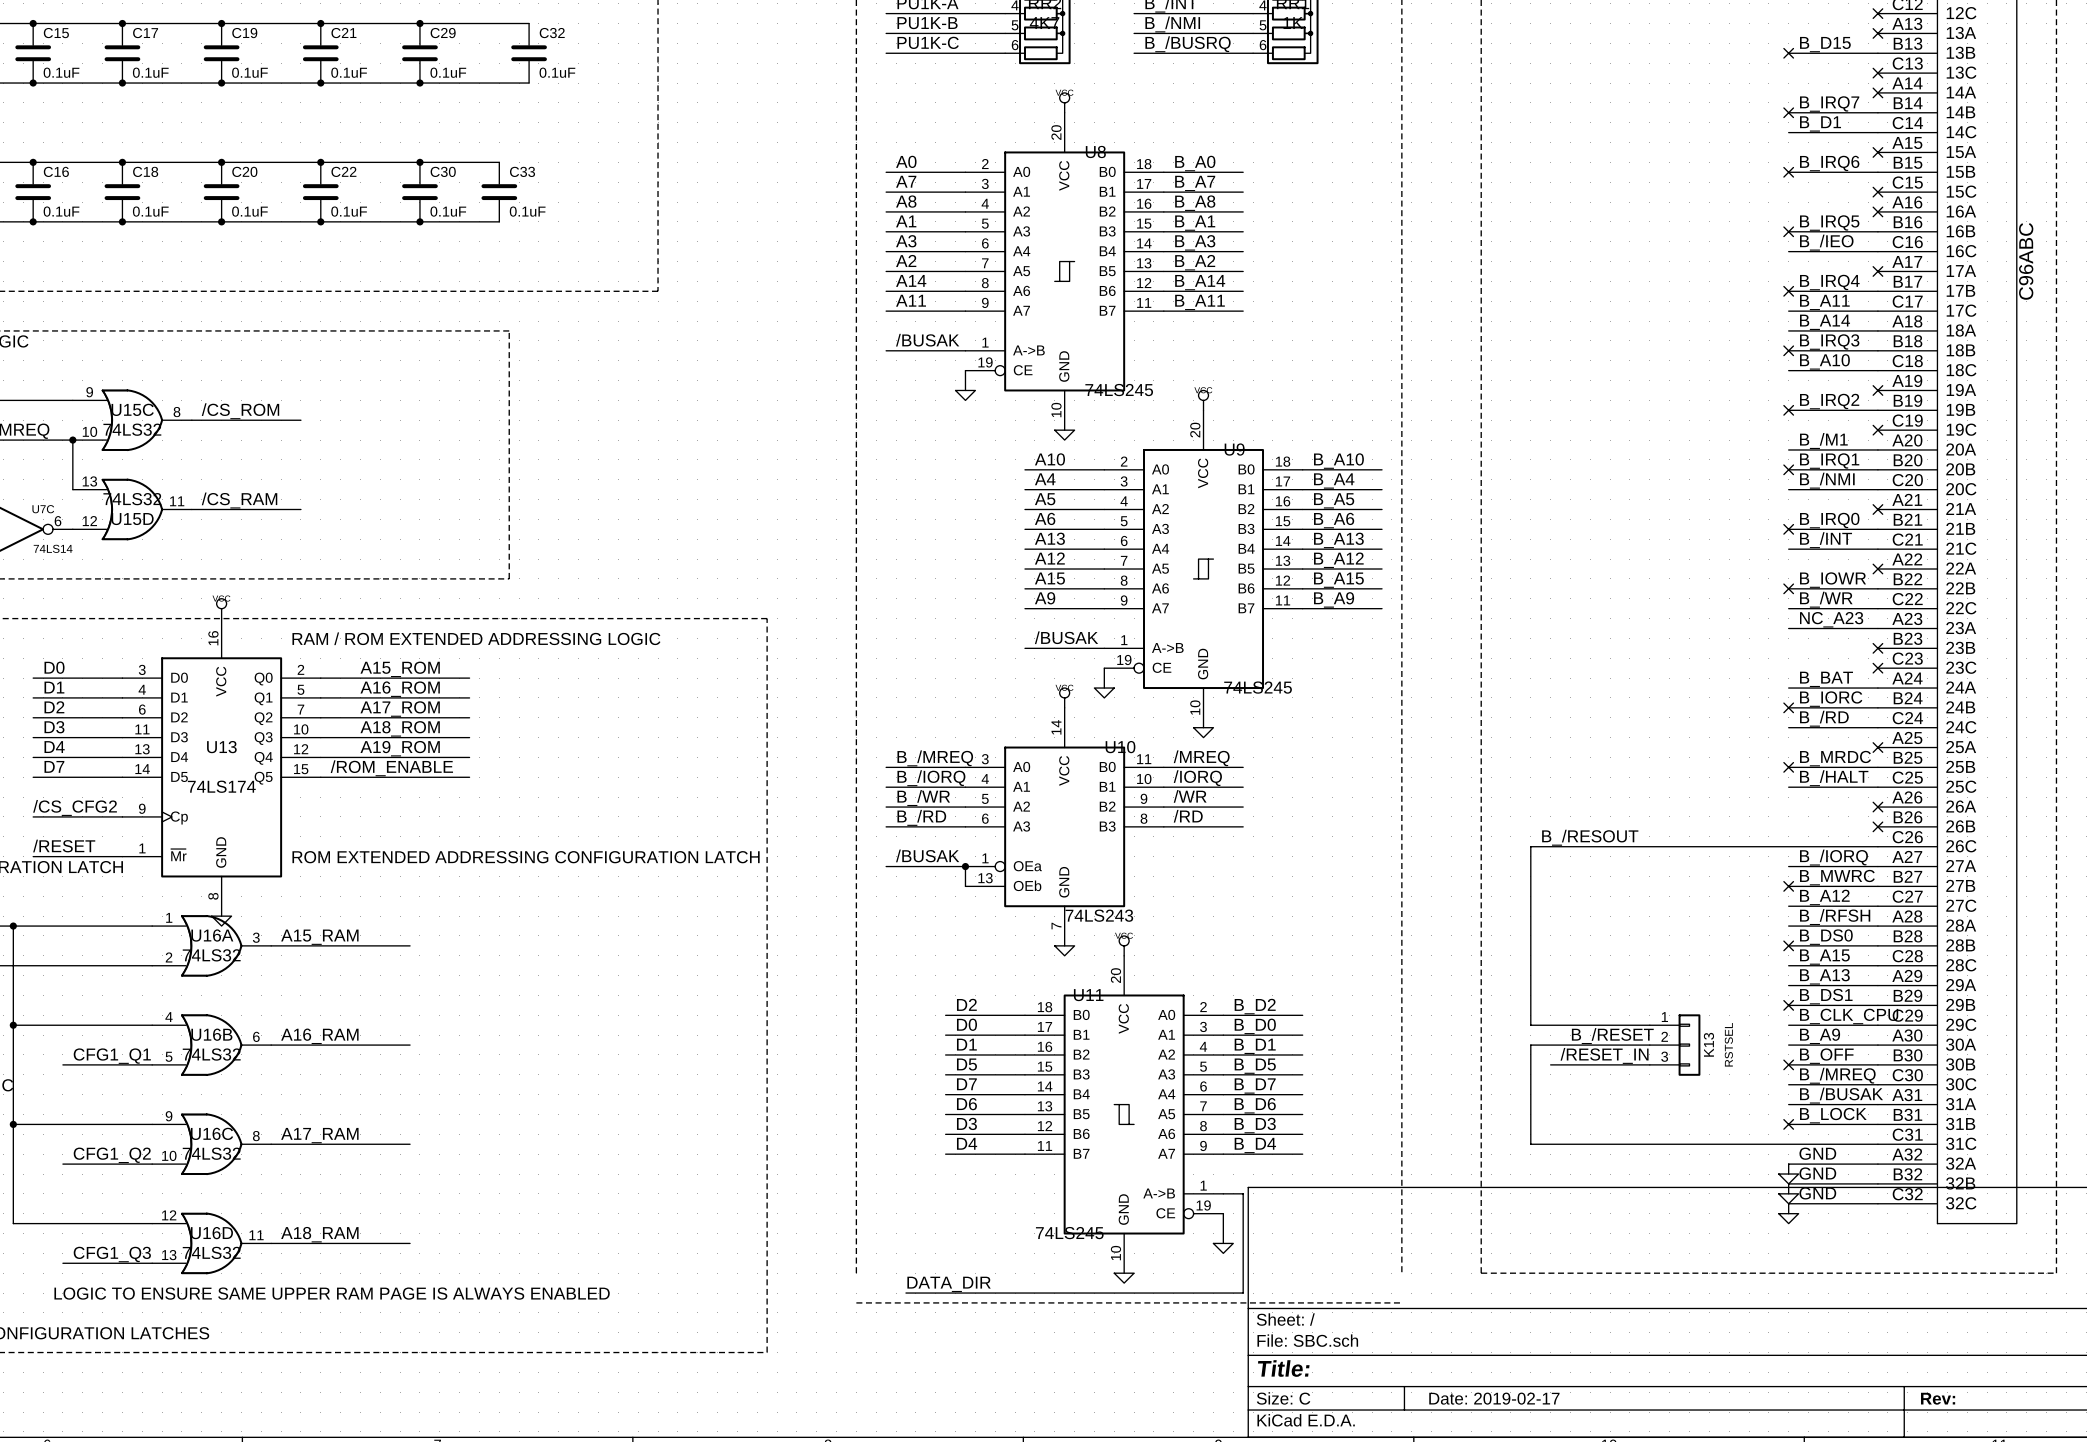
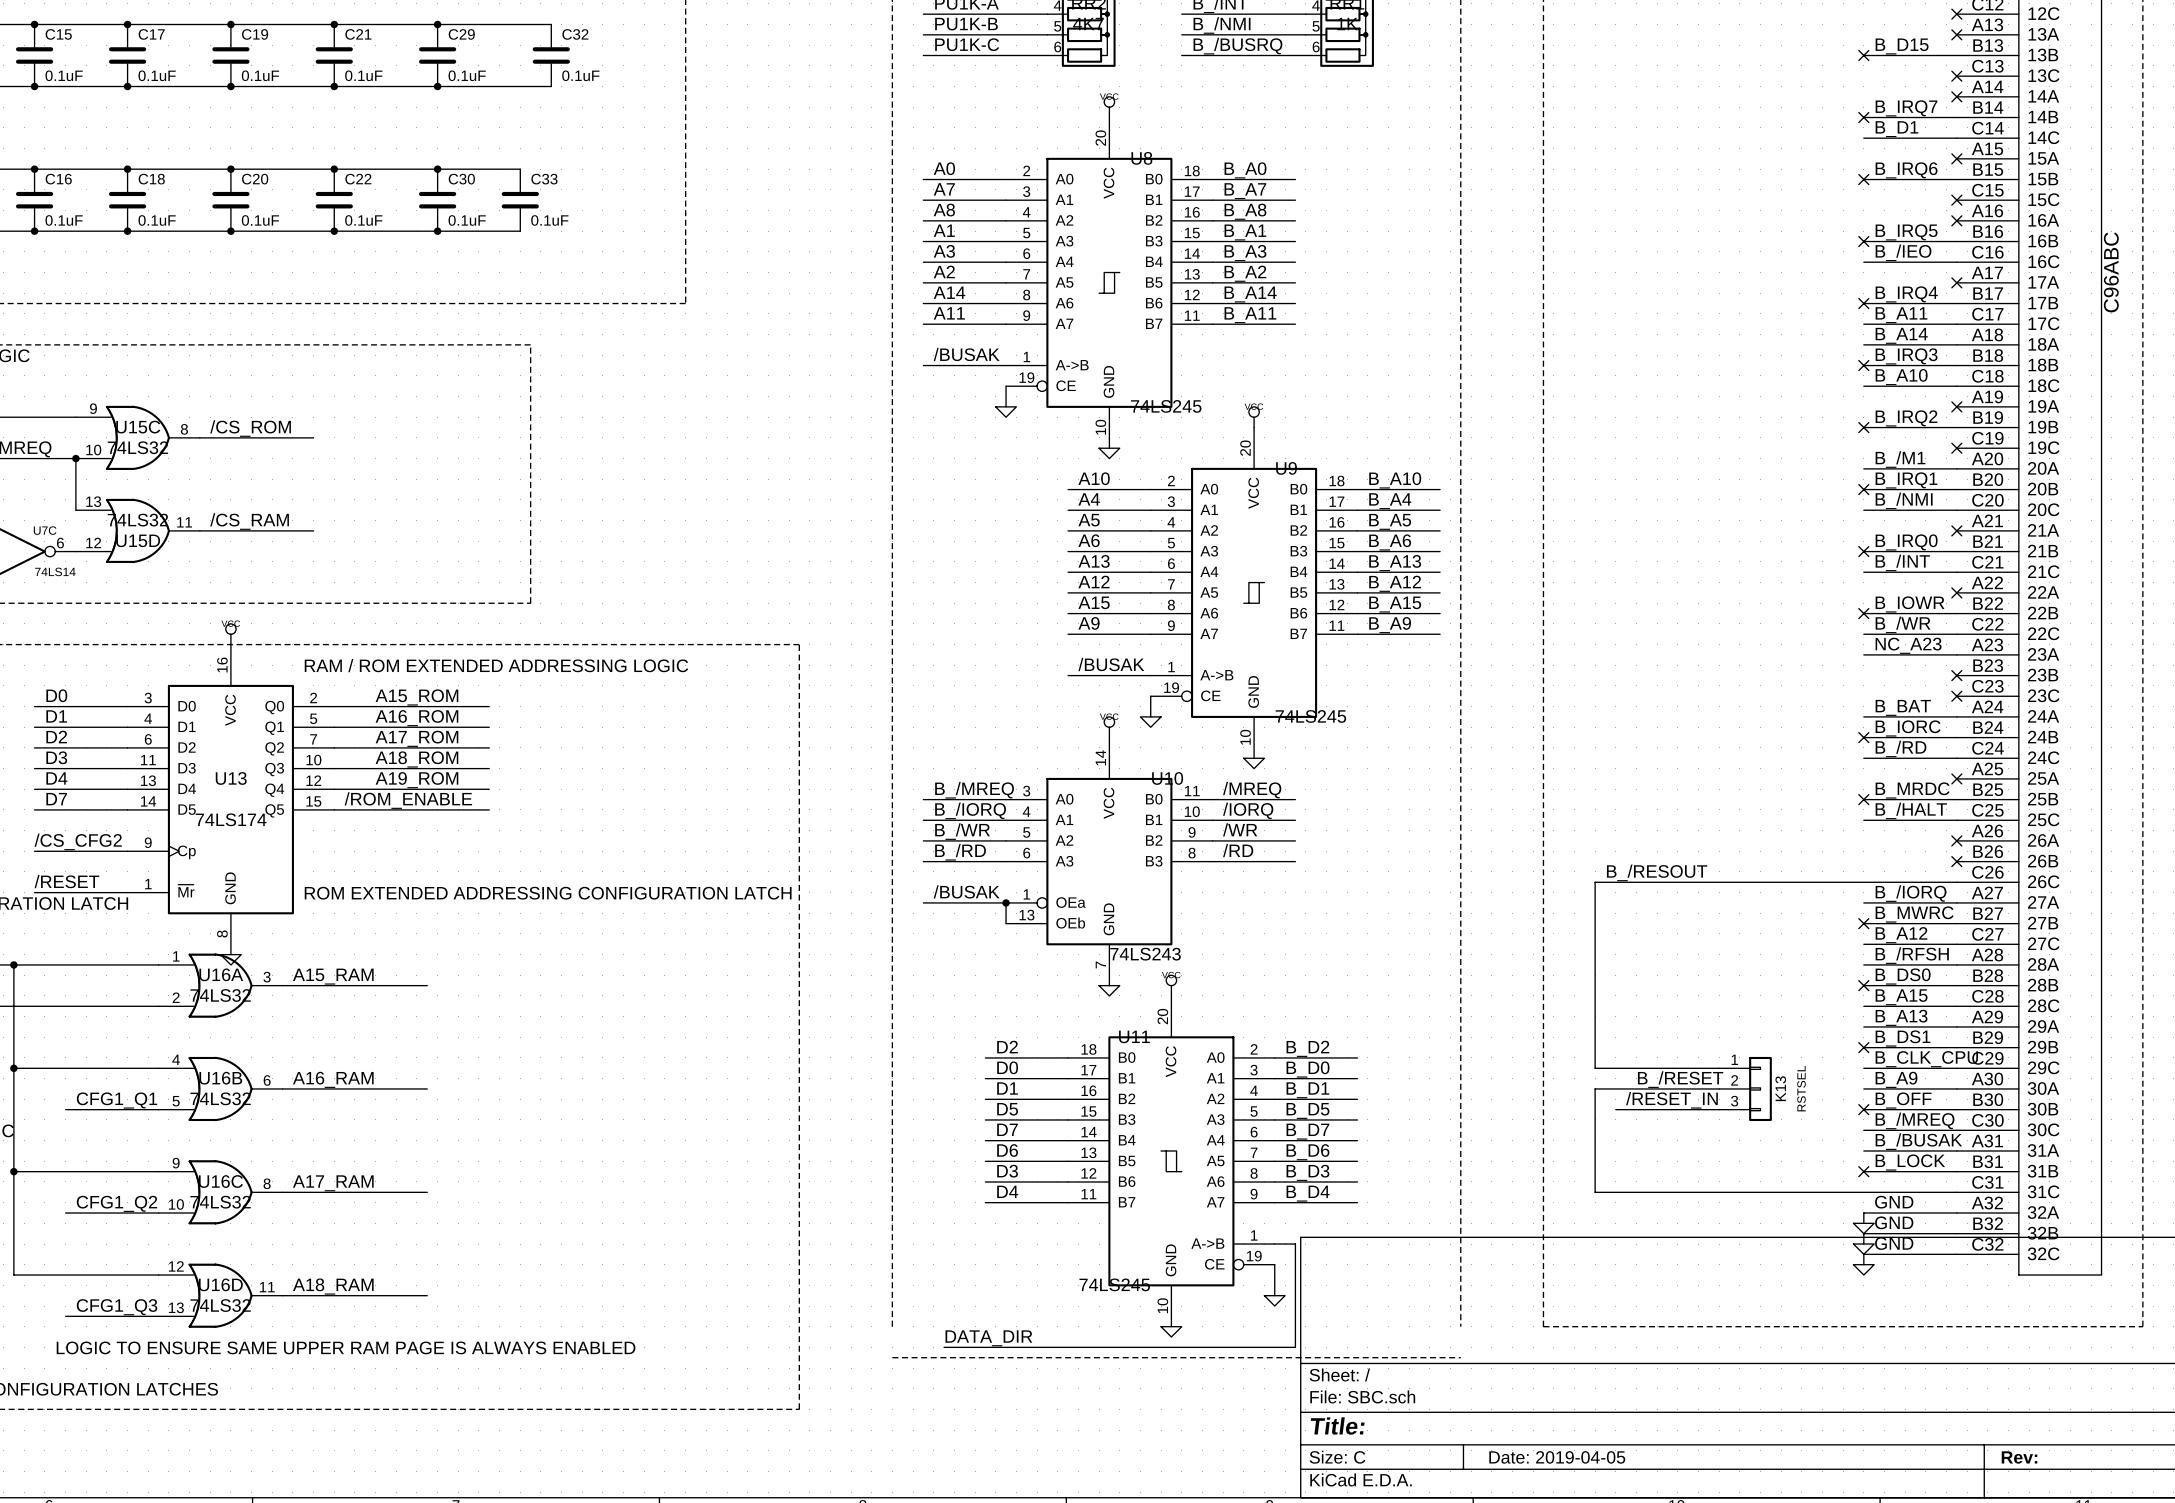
title block: Date: 2019-02-17 (1494, 1398) -> Date: 2019-04-05 (1557, 1457)

